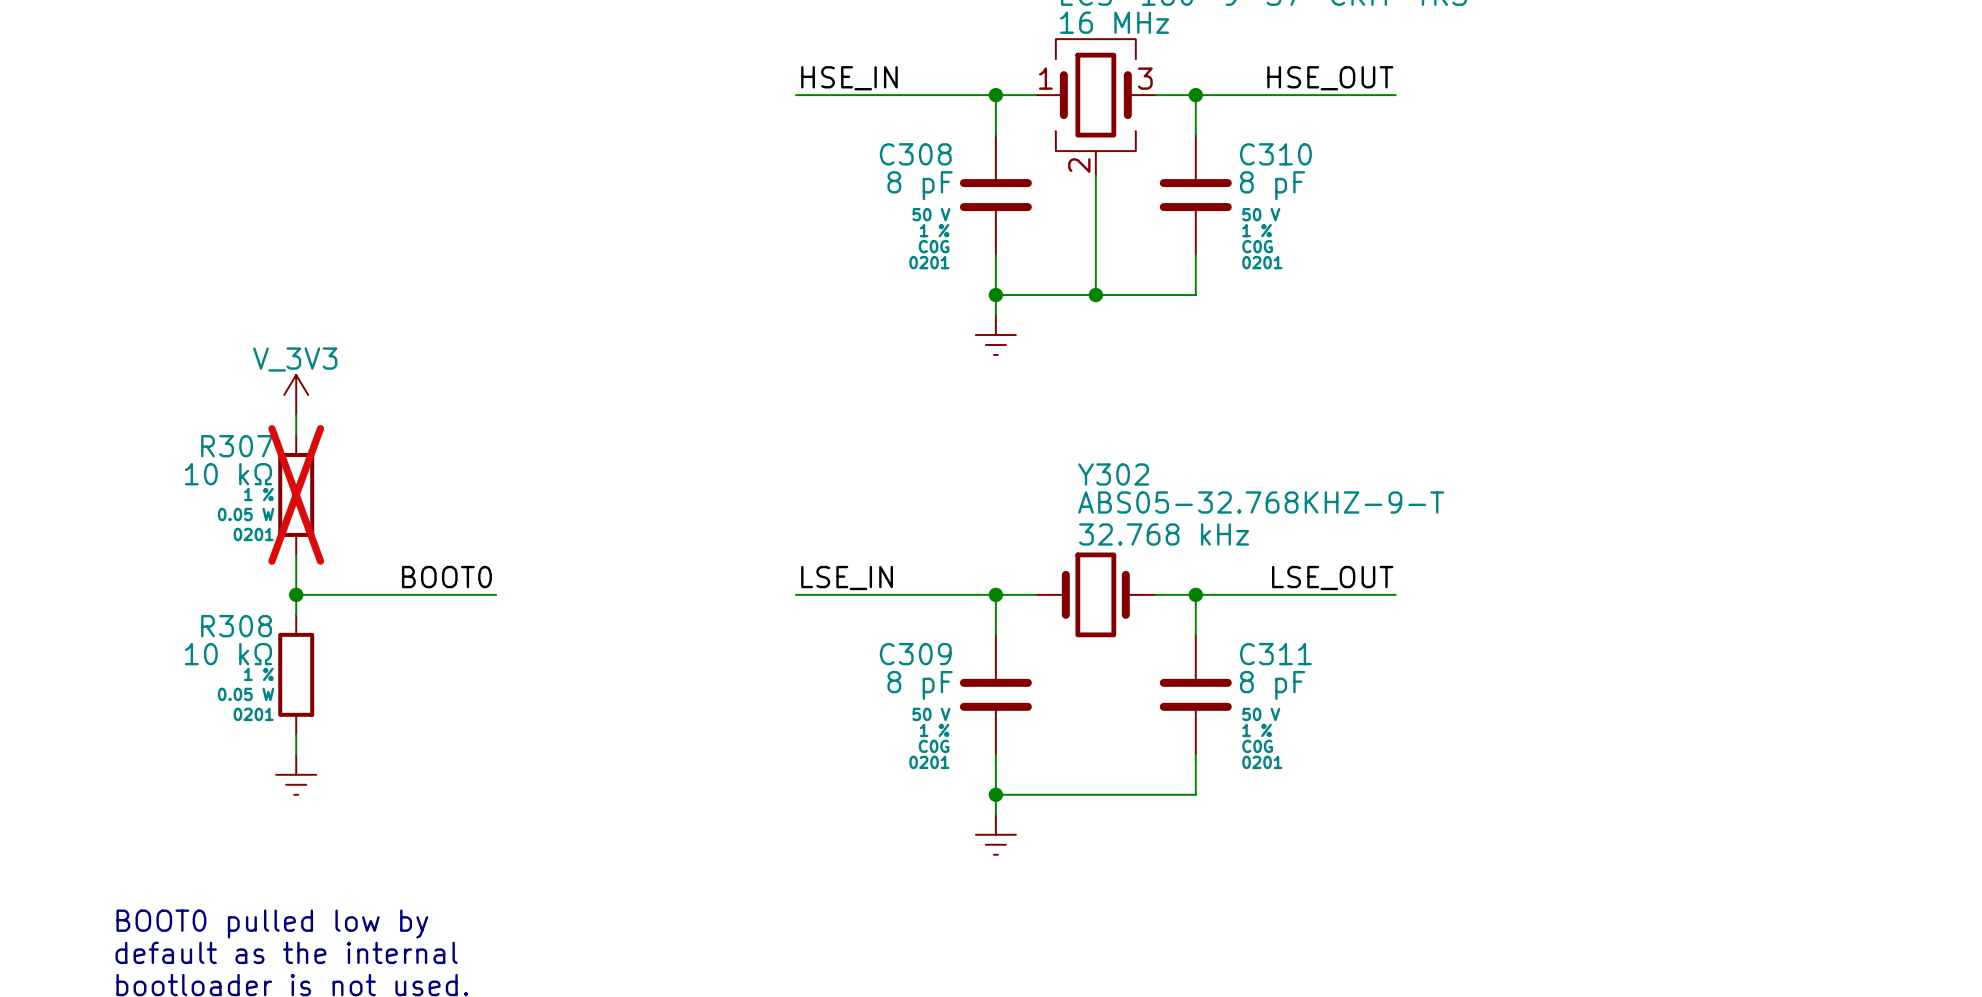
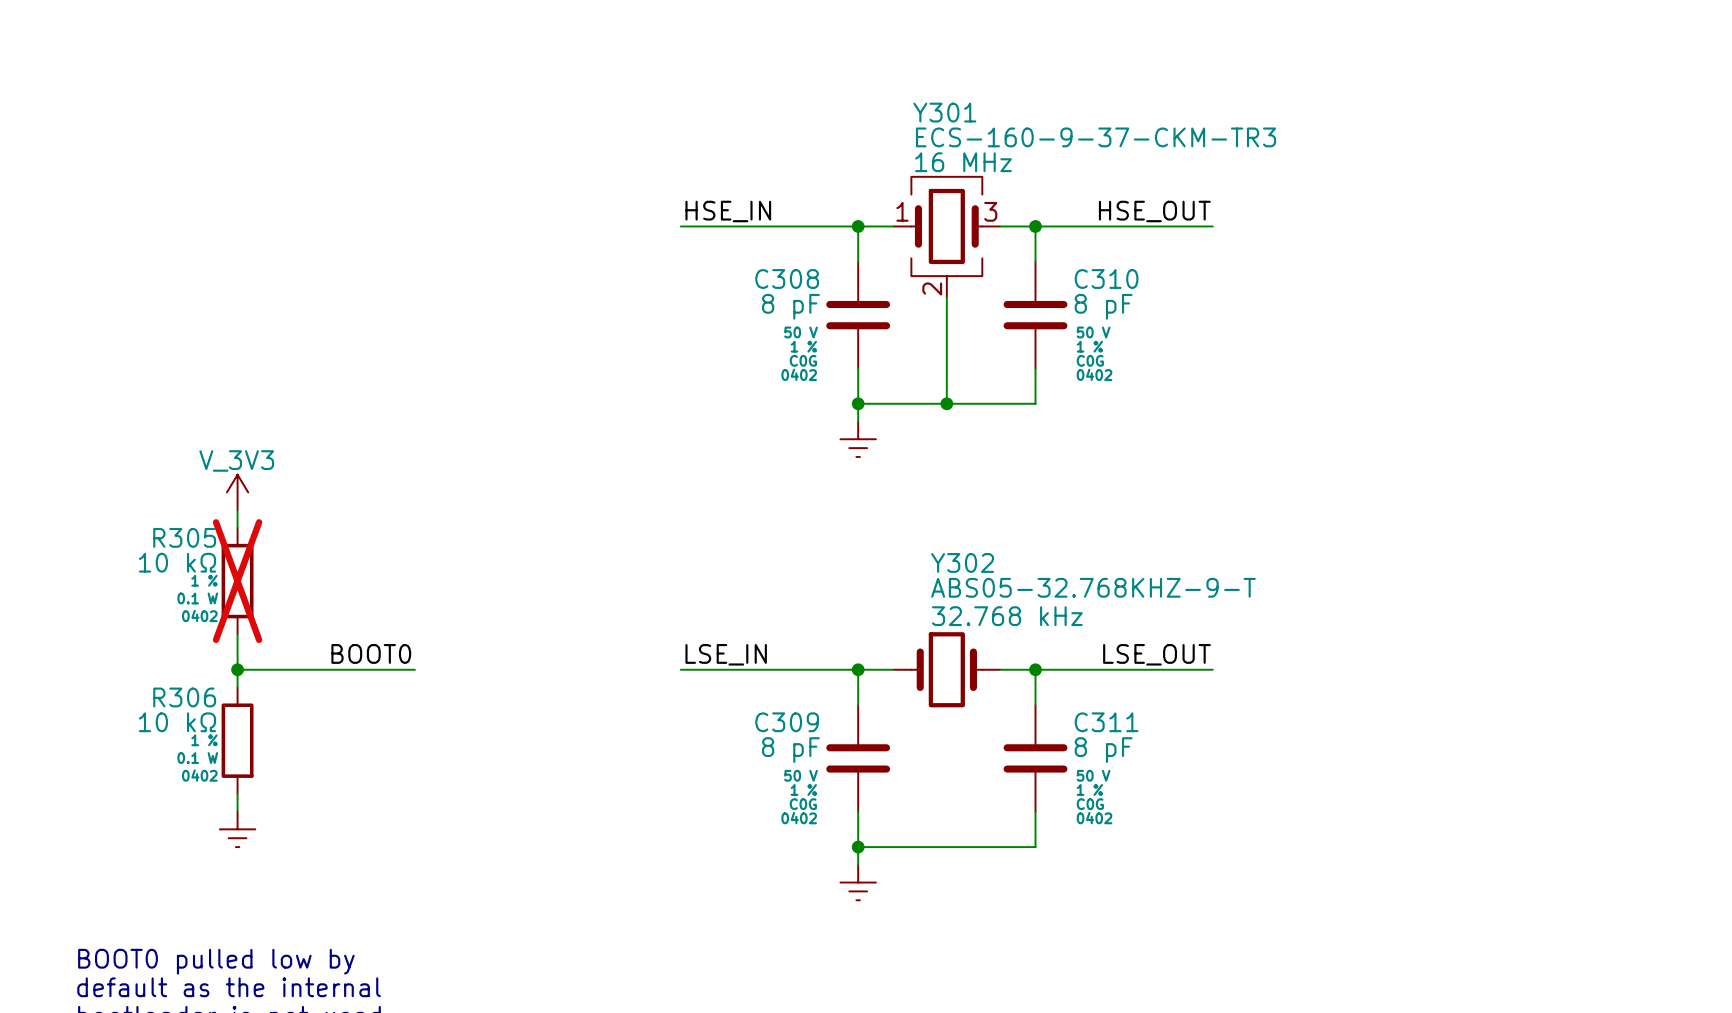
C308 text: 0201 (929, 262) -> 0402 (799, 374)
C310 text: 0201 (1262, 262) -> 0402 (1094, 374)
R307 name: R307 (237, 446) -> R305 (184, 537)
R307 text: 0.05 W (246, 514) -> 0.1 W (197, 598)
R307 text: 0201 (253, 534) -> 0402 (199, 615)
R308 name: R308 (236, 626) -> R306 (184, 697)
R308 text: 0.05 W (246, 694) -> 0.1 W (197, 758)
R308 text: 0201 (253, 714) -> 0402 (199, 775)
C309 text: 0201 (929, 762) -> 0402 (799, 818)
C311 text: 0201 (1262, 762) -> 0402 (1094, 818)

